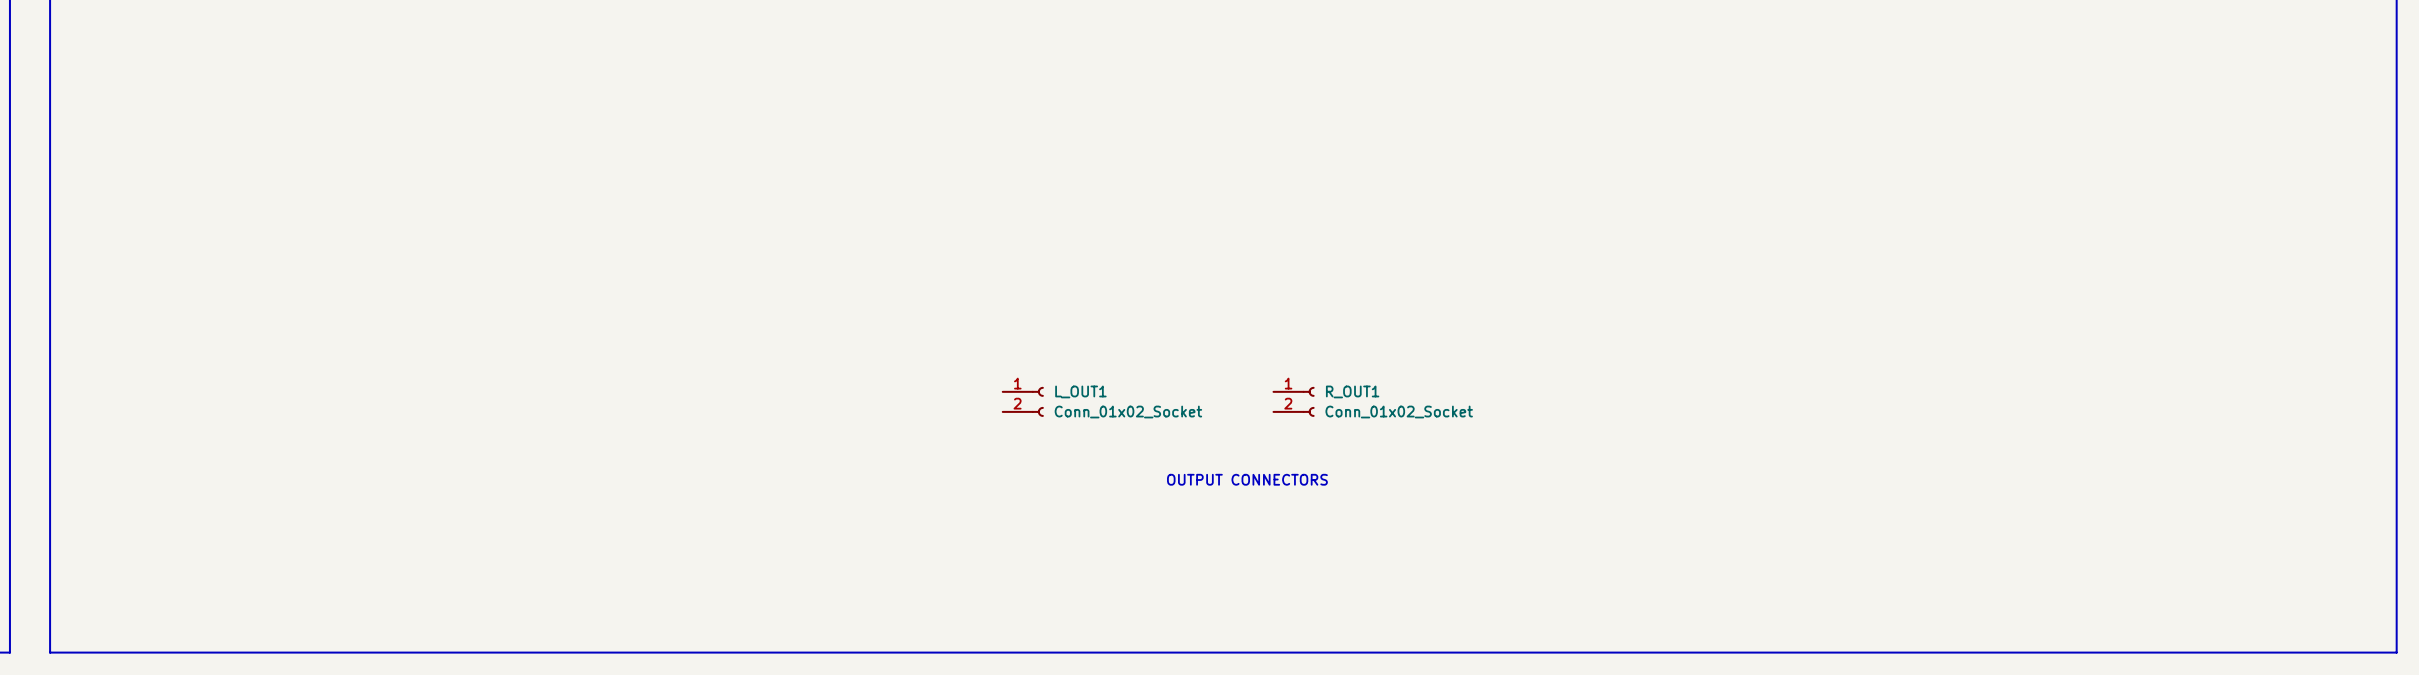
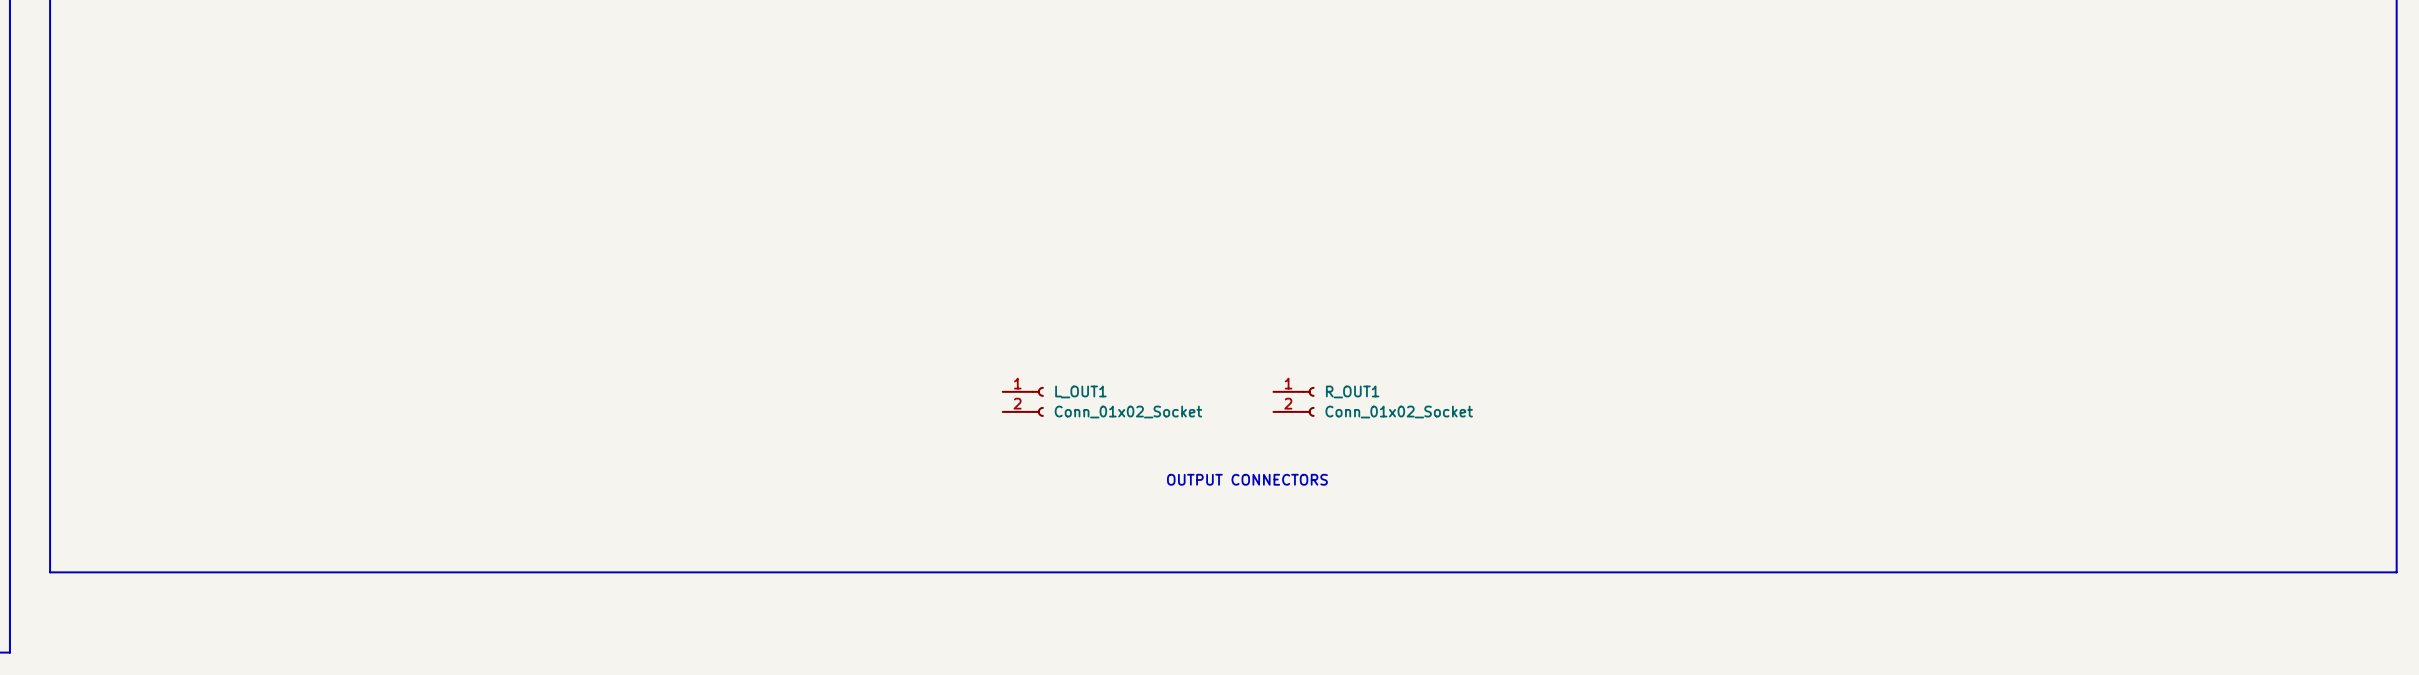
line: (50, 572) (50, 652) (2396, 652) (2396, 572) -> (50, 572) (2396, 572)

